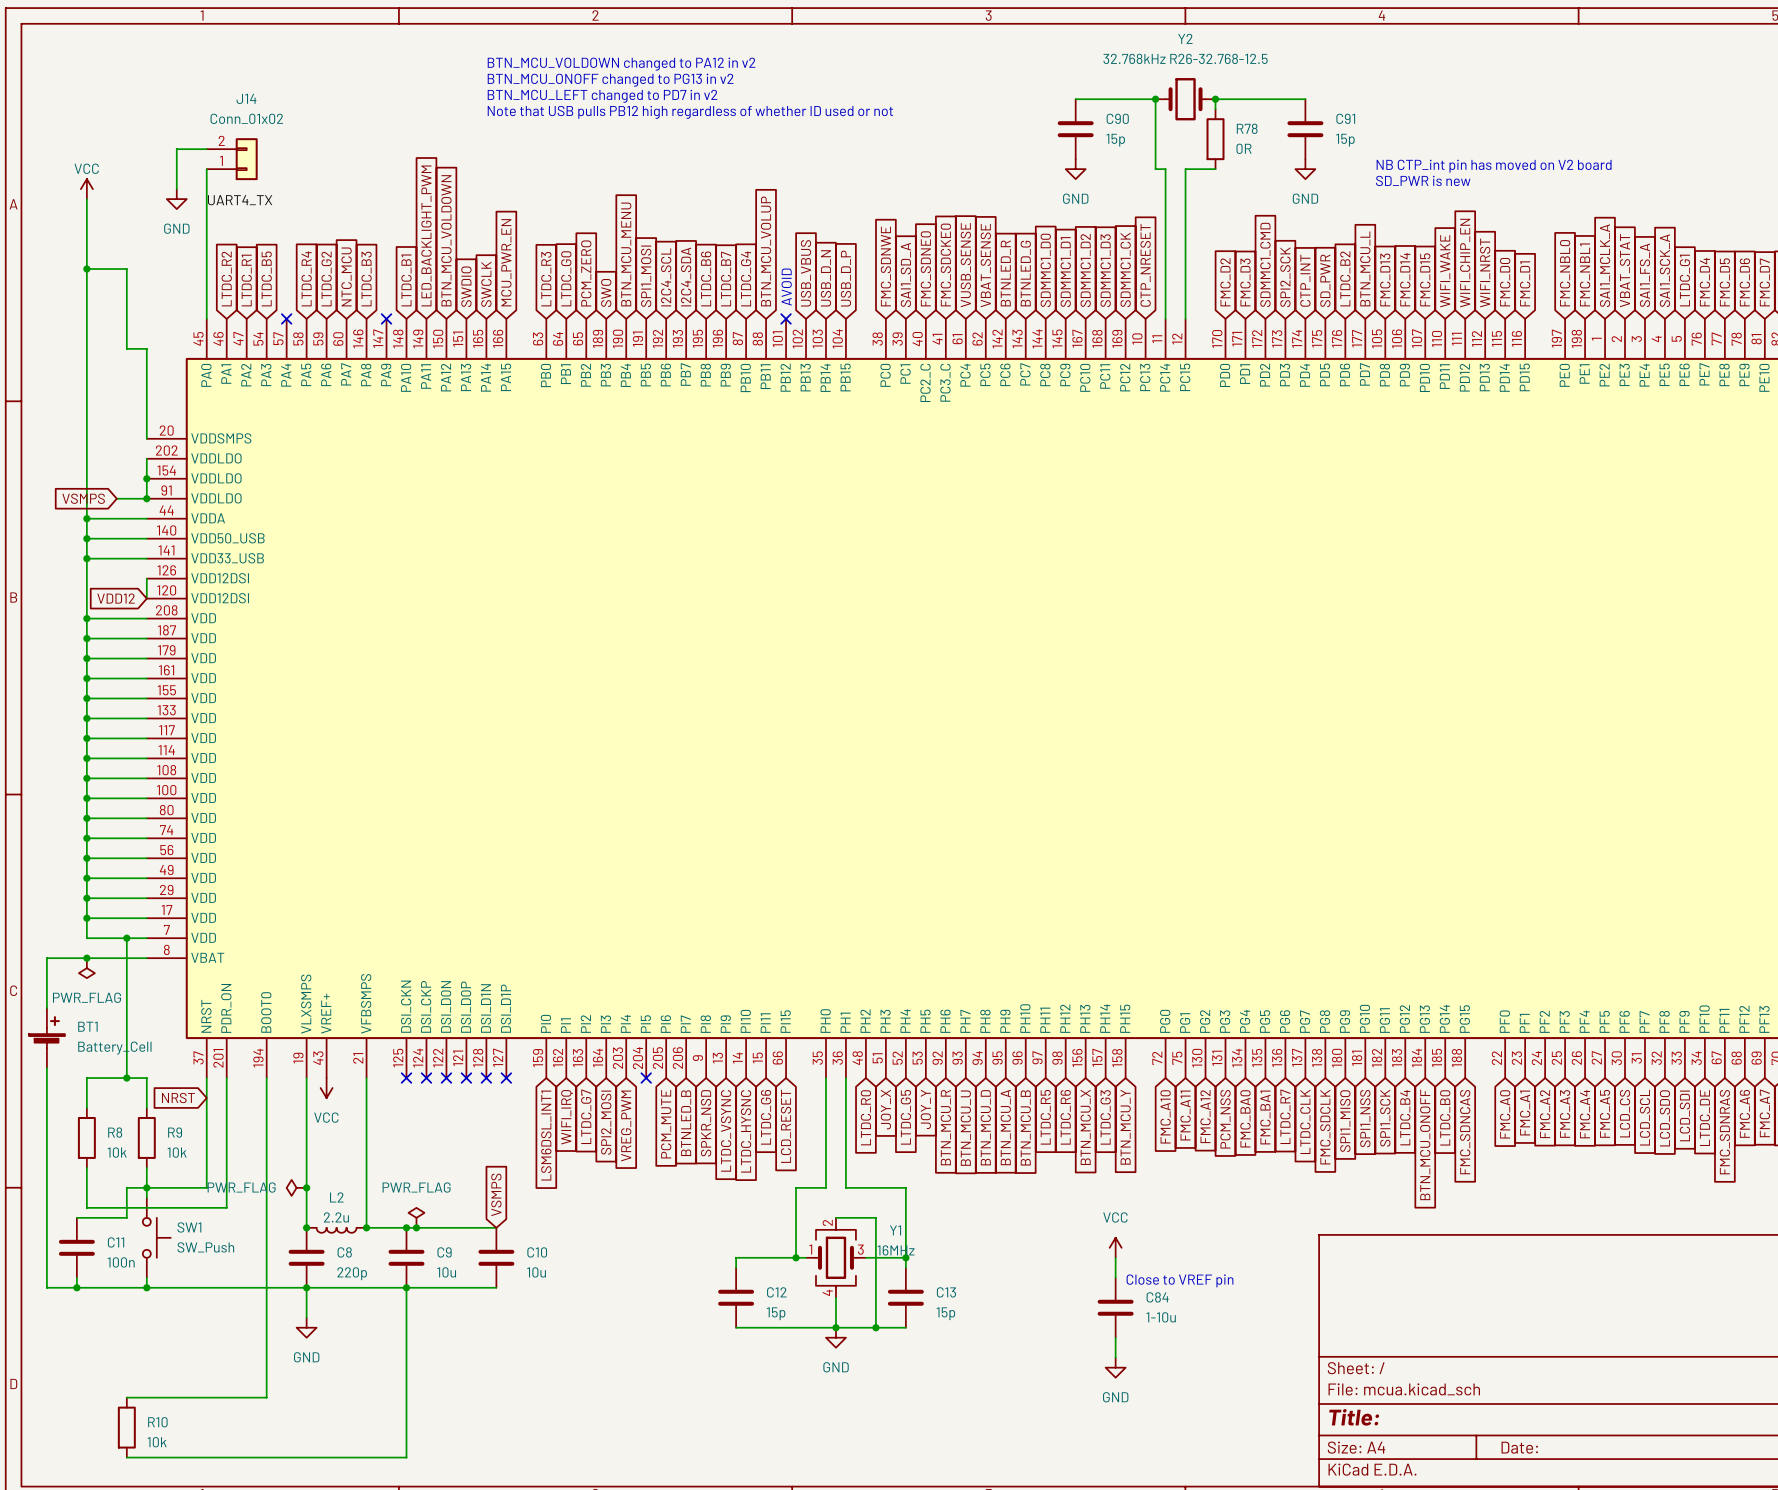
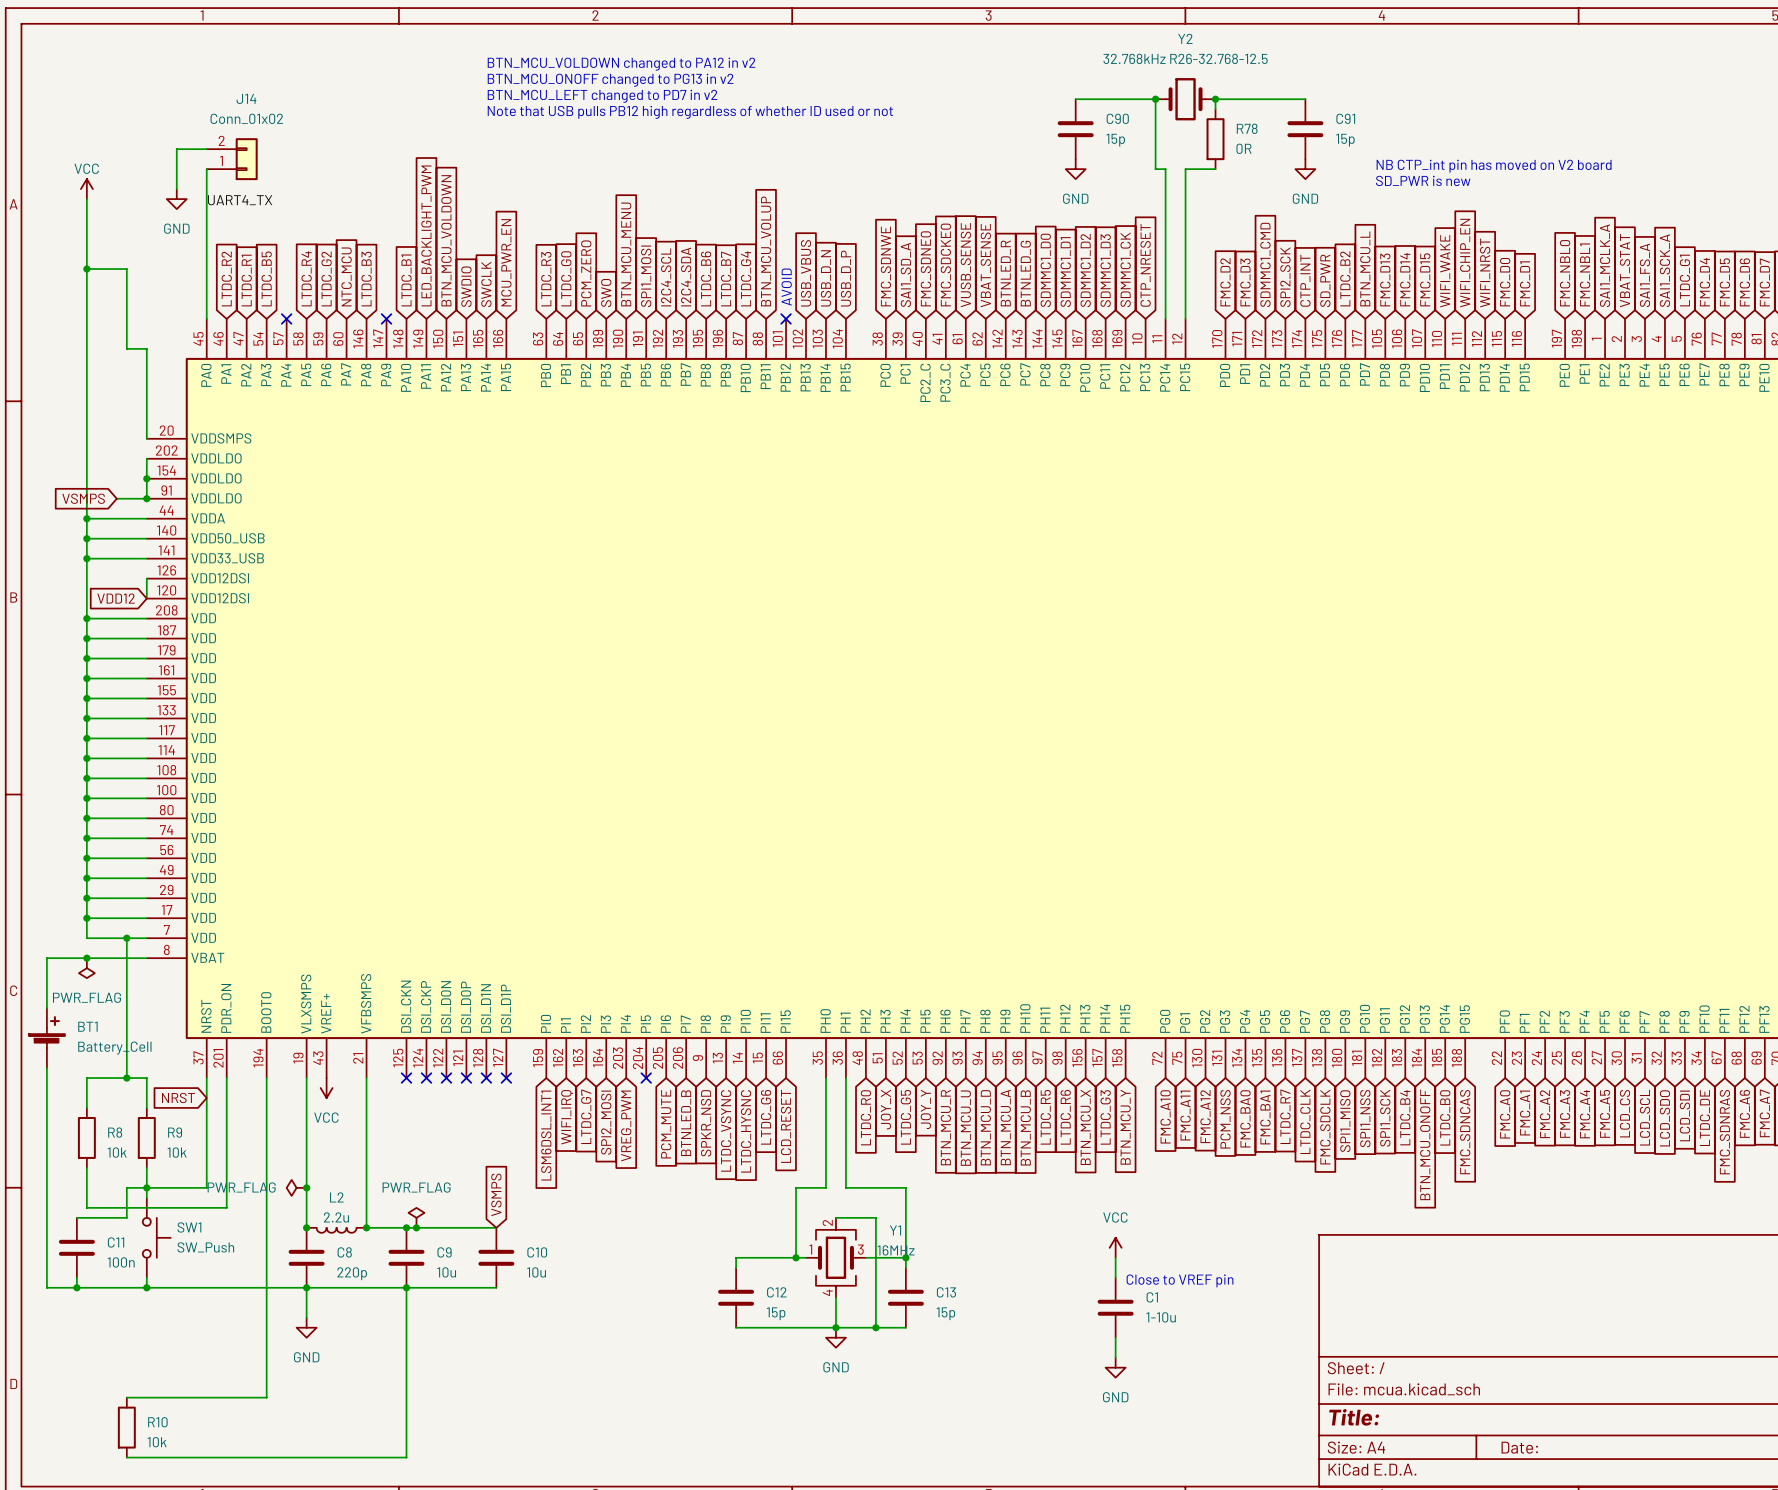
C84 name: C84 (1157, 1297) -> C1 (1152, 1297)

